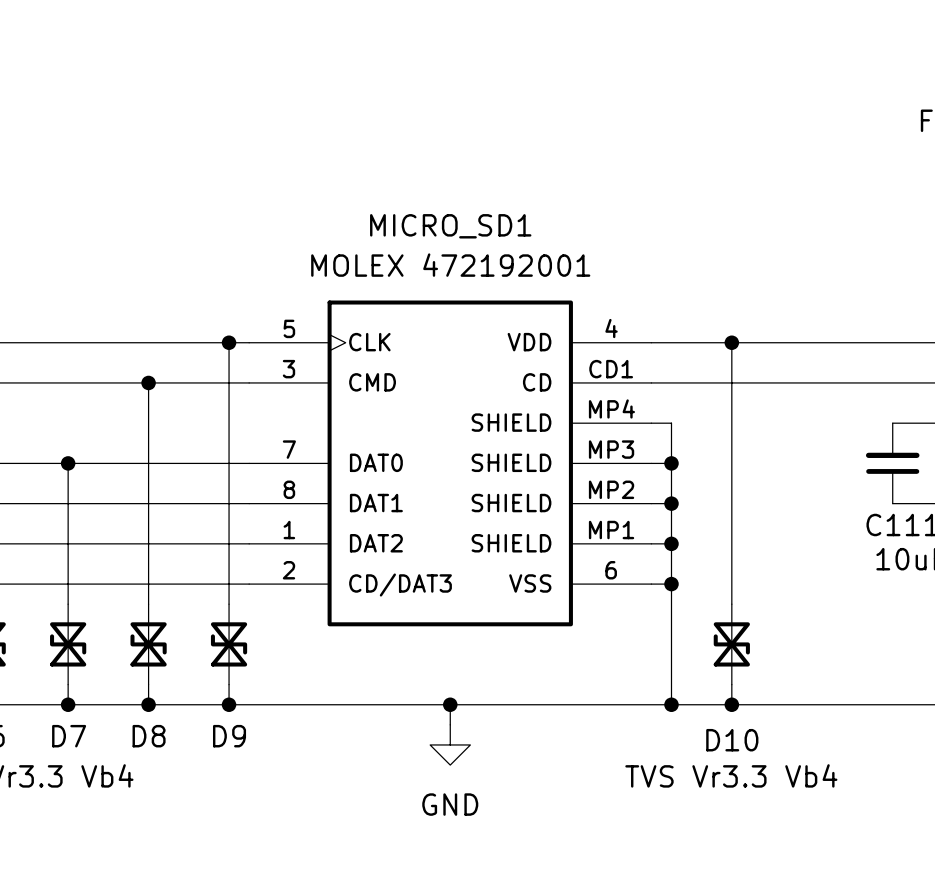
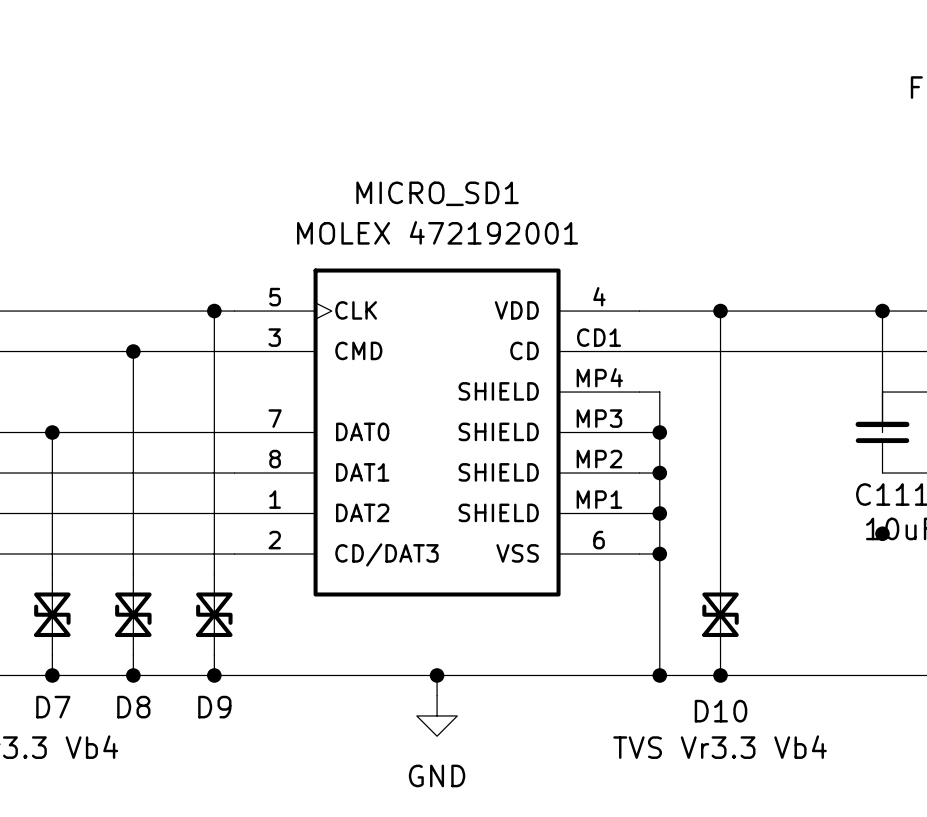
wire: none -> (882, 311) (882, 432)
junction: none -> (882, 311)
junction: none -> (882, 533)

